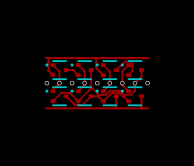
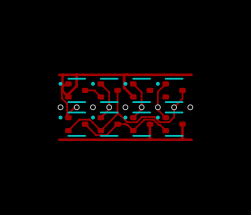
top track: none -> (76, 74) (76, 86) (67, 95)
top track: none -> (67, 82) (61, 87) (61, 98) (67, 103) (67, 115) (76, 105)
top track: (53, 65) (59, 71) (59, 83) (53, 91) -> none
top track: (116, 70) (124, 61) (131, 61) (132, 71) (128, 75) -> none

